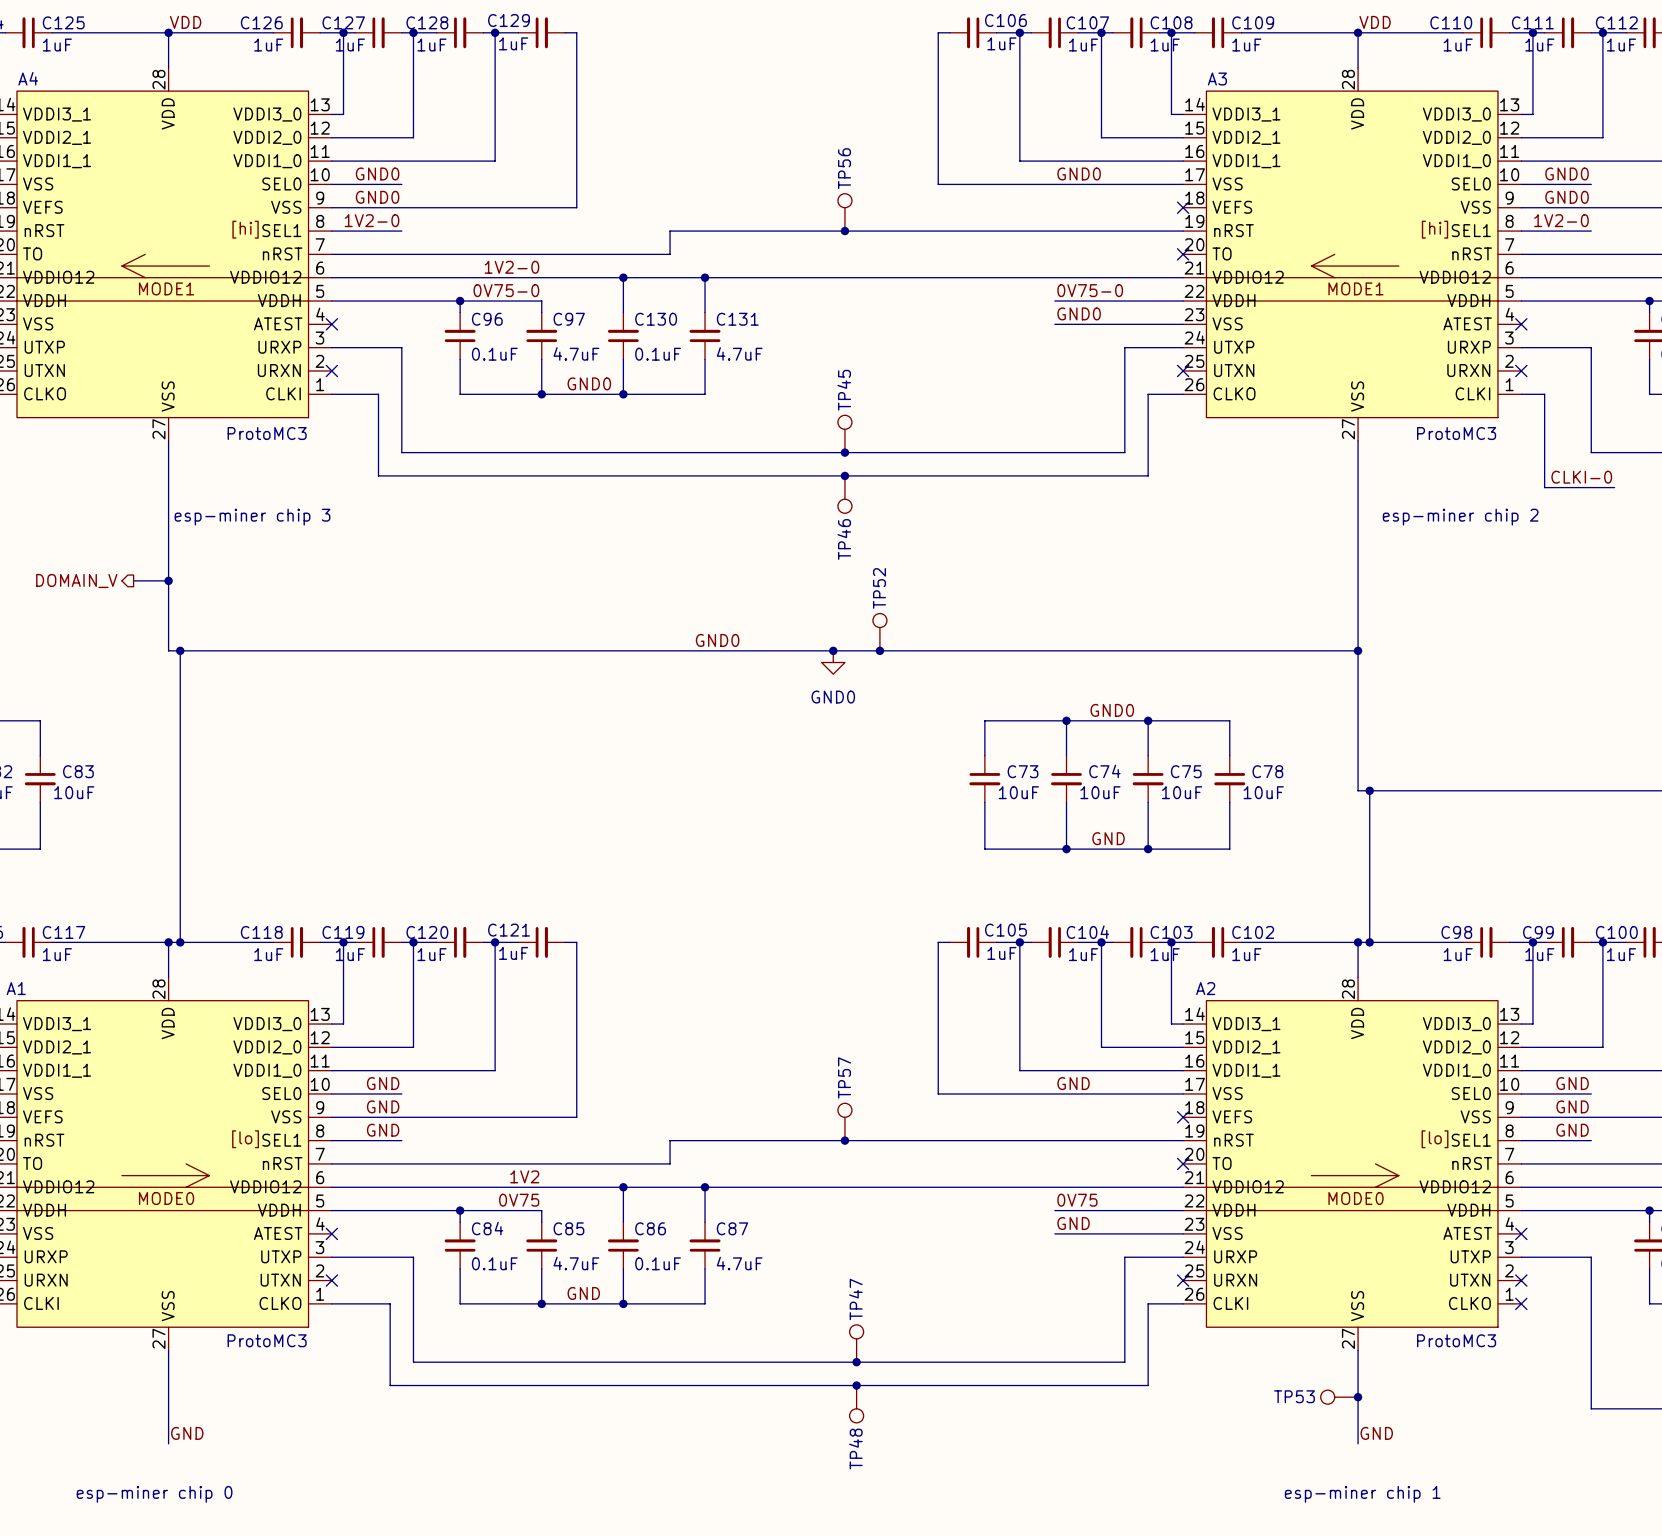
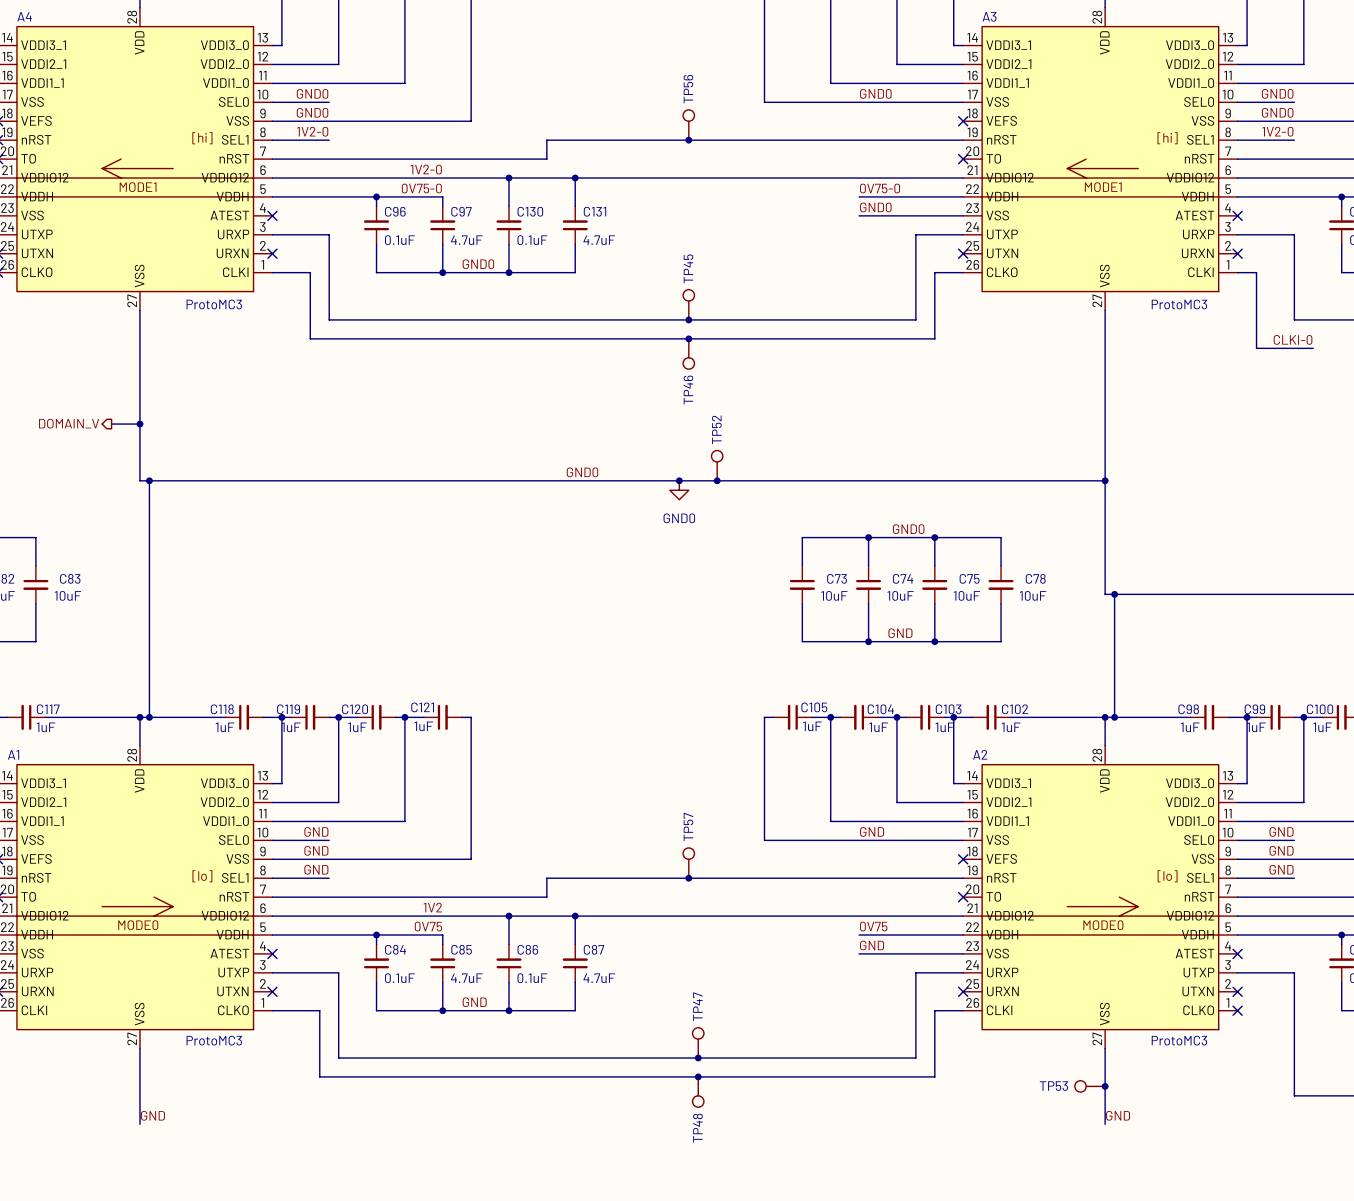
text: esp-miner chip 3 (252, 517) -> none
text: esp-miner chip 2 (1460, 517) -> none
text: esp-miner chip 0 (154, 1494) -> none
text: esp-miner chip 1 (1362, 1494) -> none

